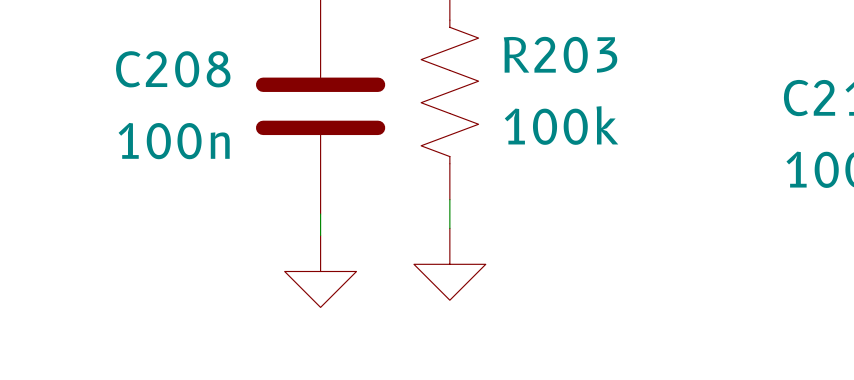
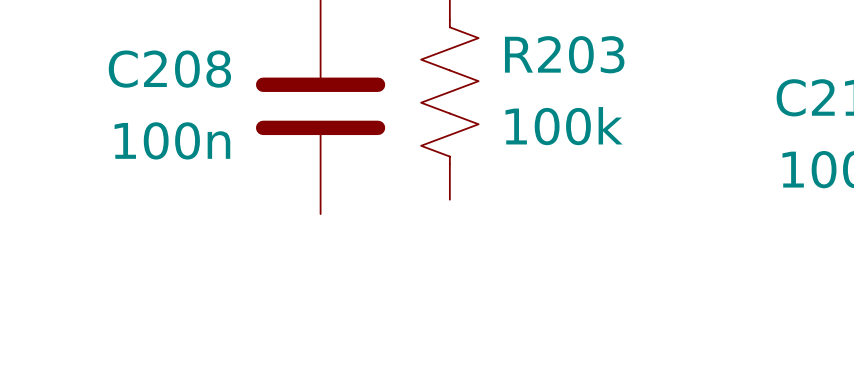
wire: (449, 199) (449, 228) -> none
wire: (320, 214) (320, 235) -> none
power symbol: (449, 264) -> none
power symbol: (320, 271) -> none

